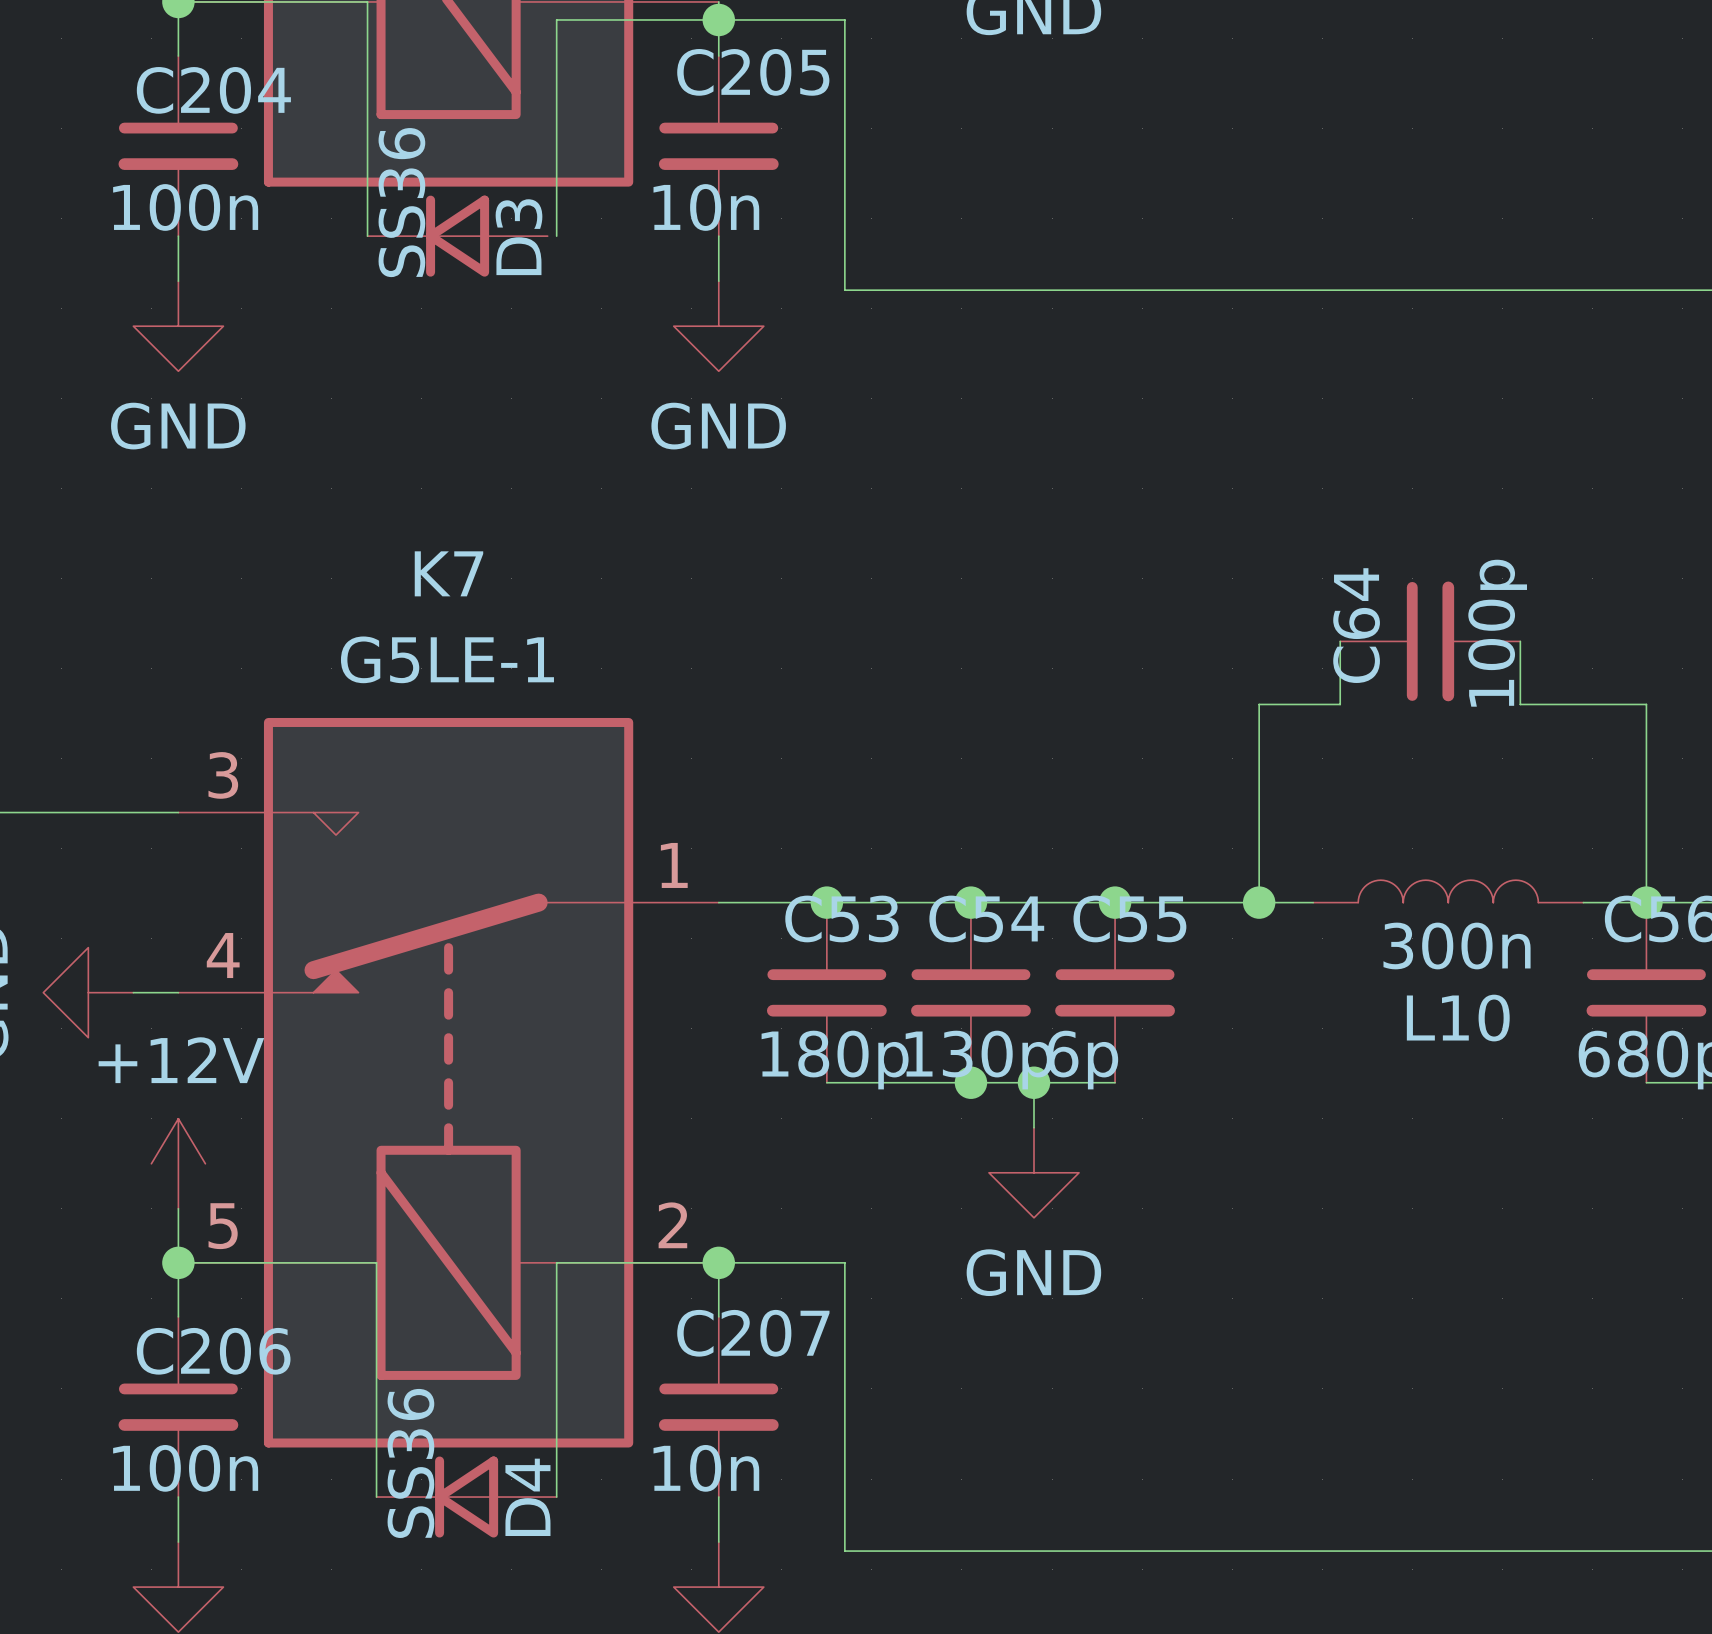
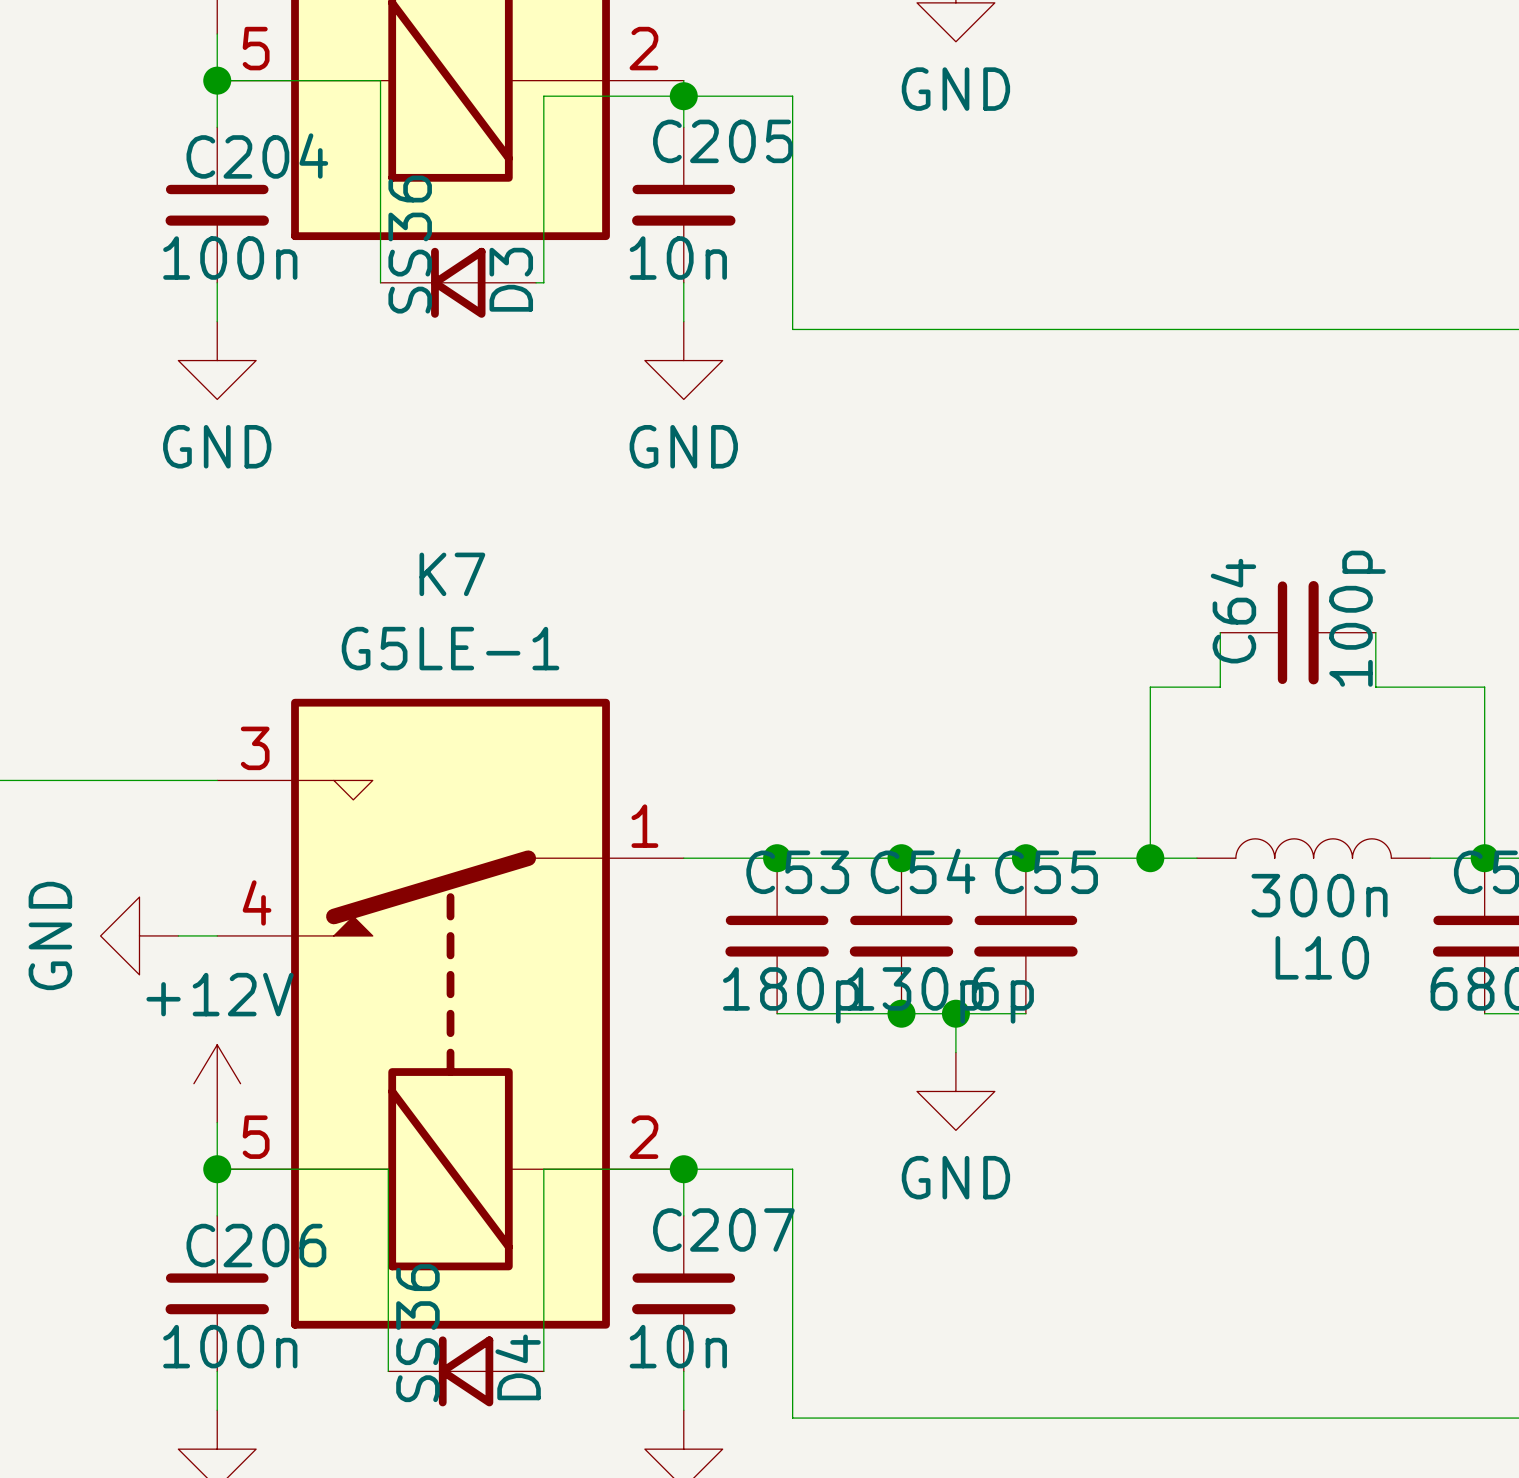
wire: none -> (536, 282) (543, 282)

